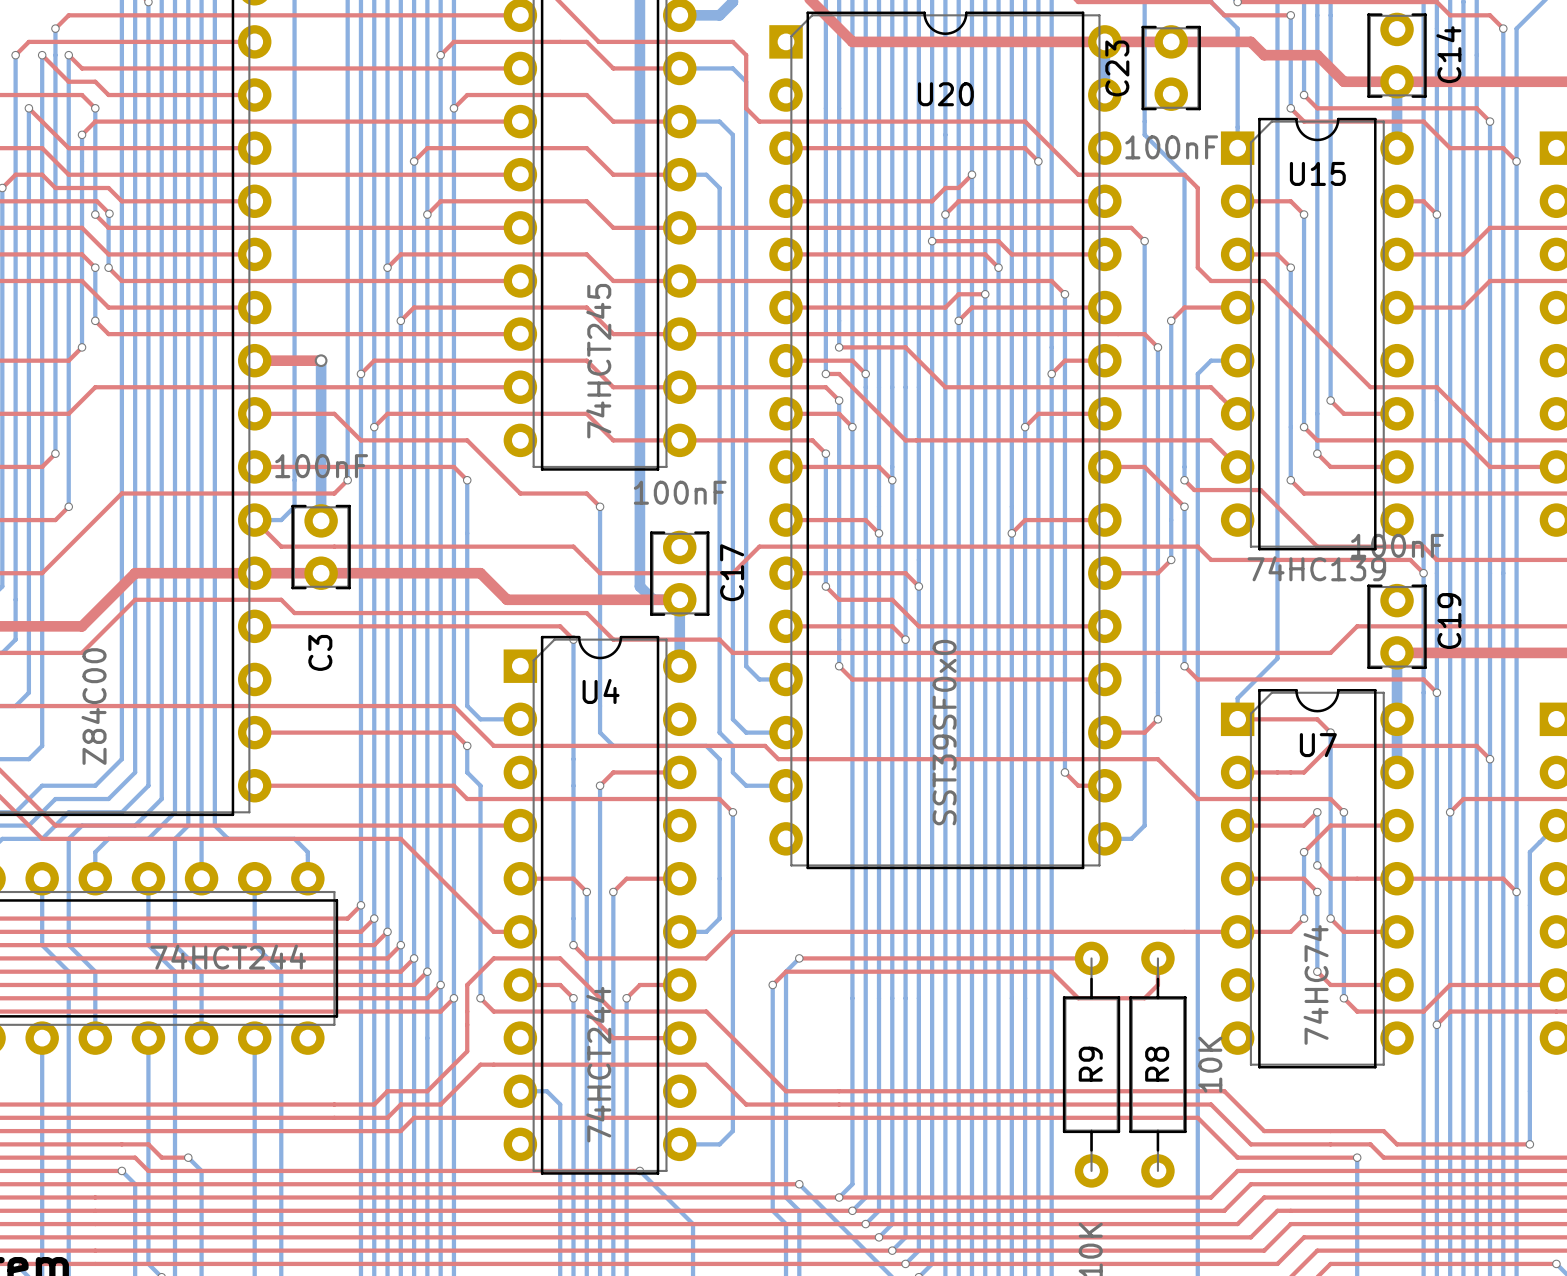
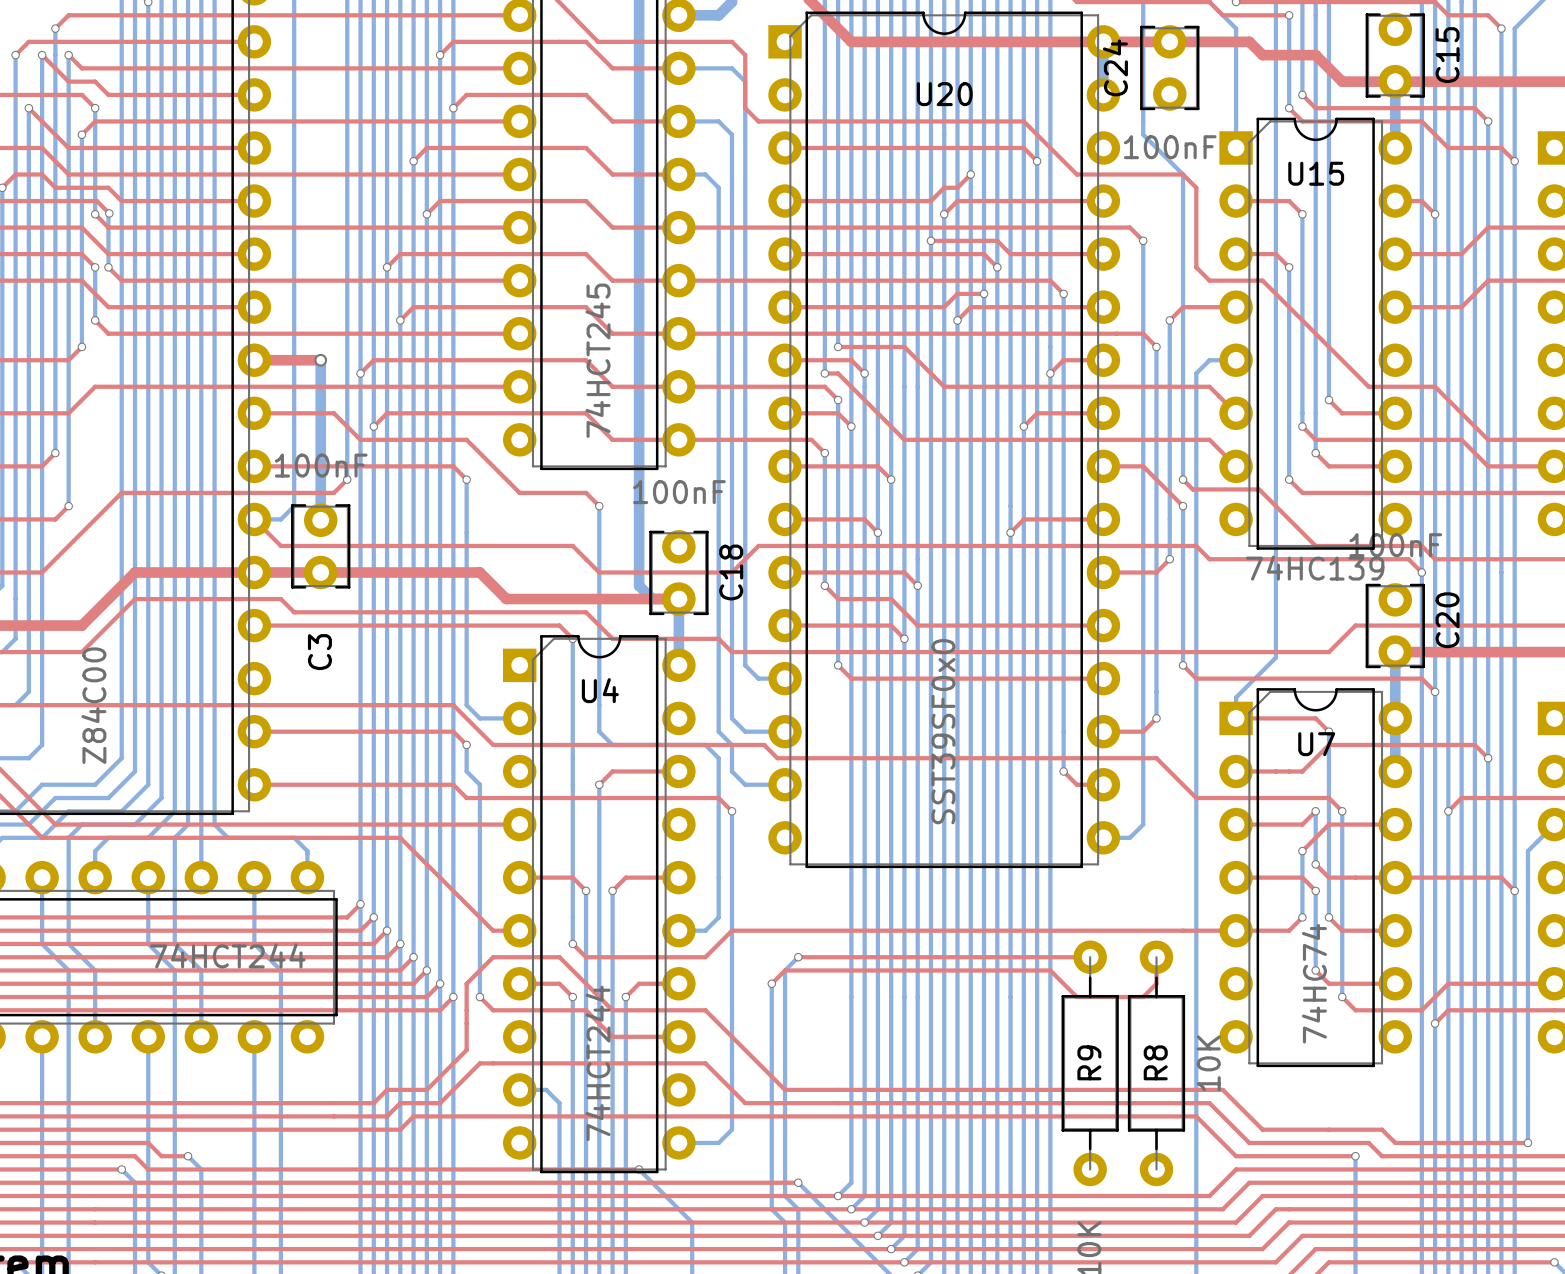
C14 name: C14 (1448, 54) -> C15 (1447, 55)
C23 name: C23 (1117, 68) -> C24 (1115, 67)
C17 name: C17 (732, 572) -> C18 (731, 572)
C19 name: C19 (1449, 621) -> C20 (1447, 620)

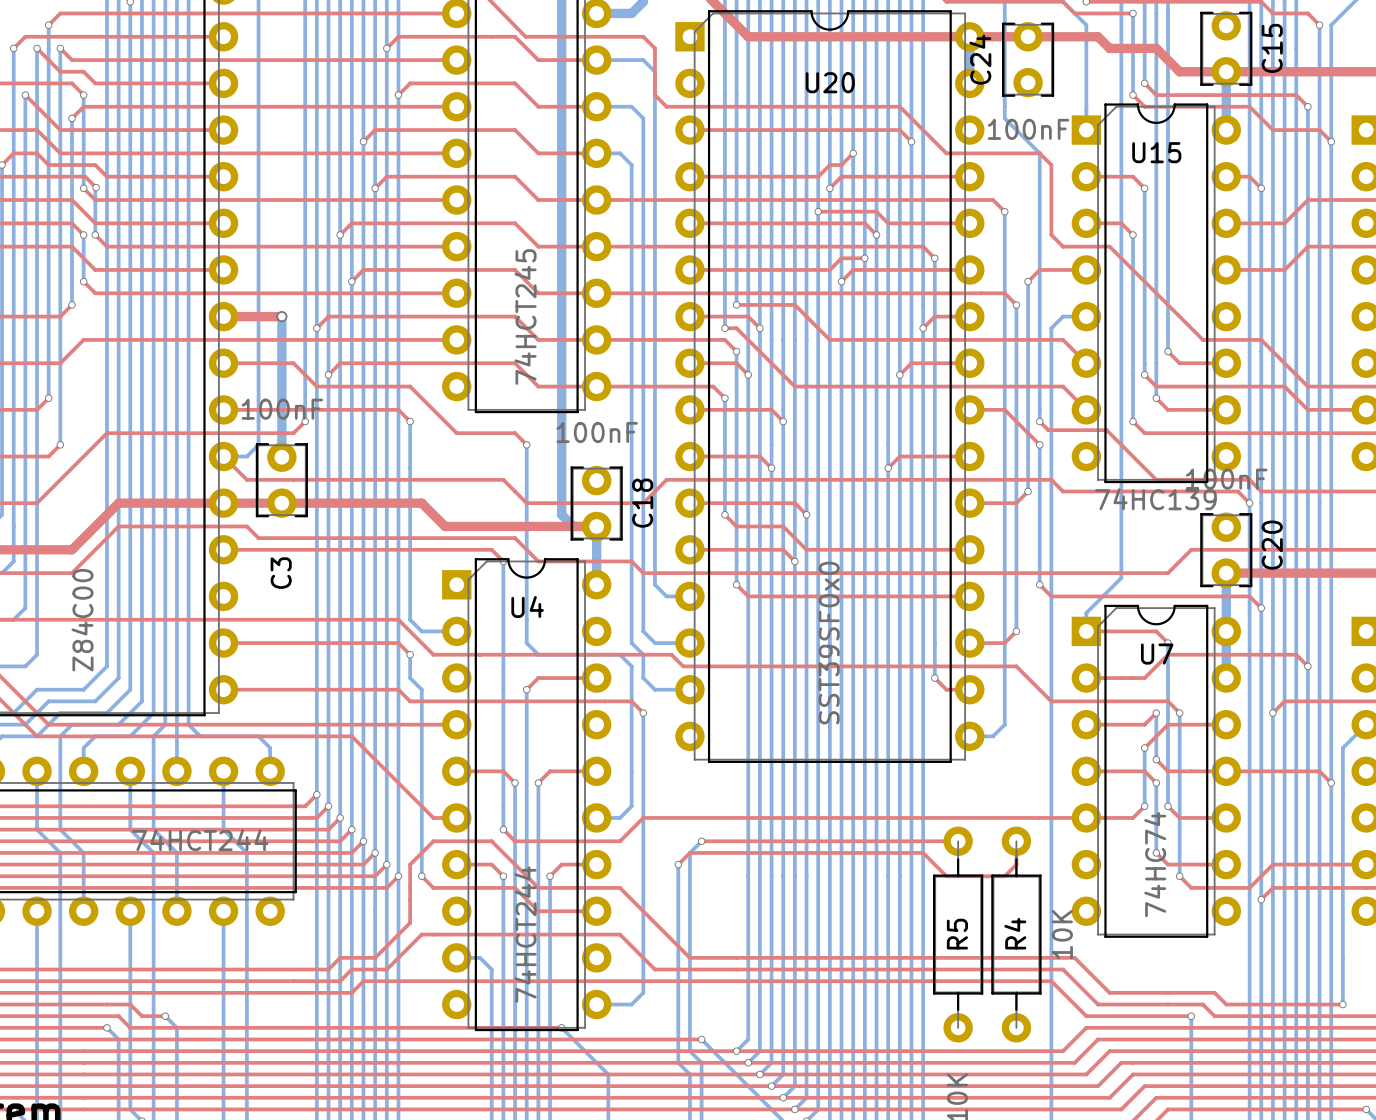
R9 name: R9 (1089, 1062) -> R5 (957, 934)
R8 name: R8 (1155, 1062) -> R4 (1015, 933)

